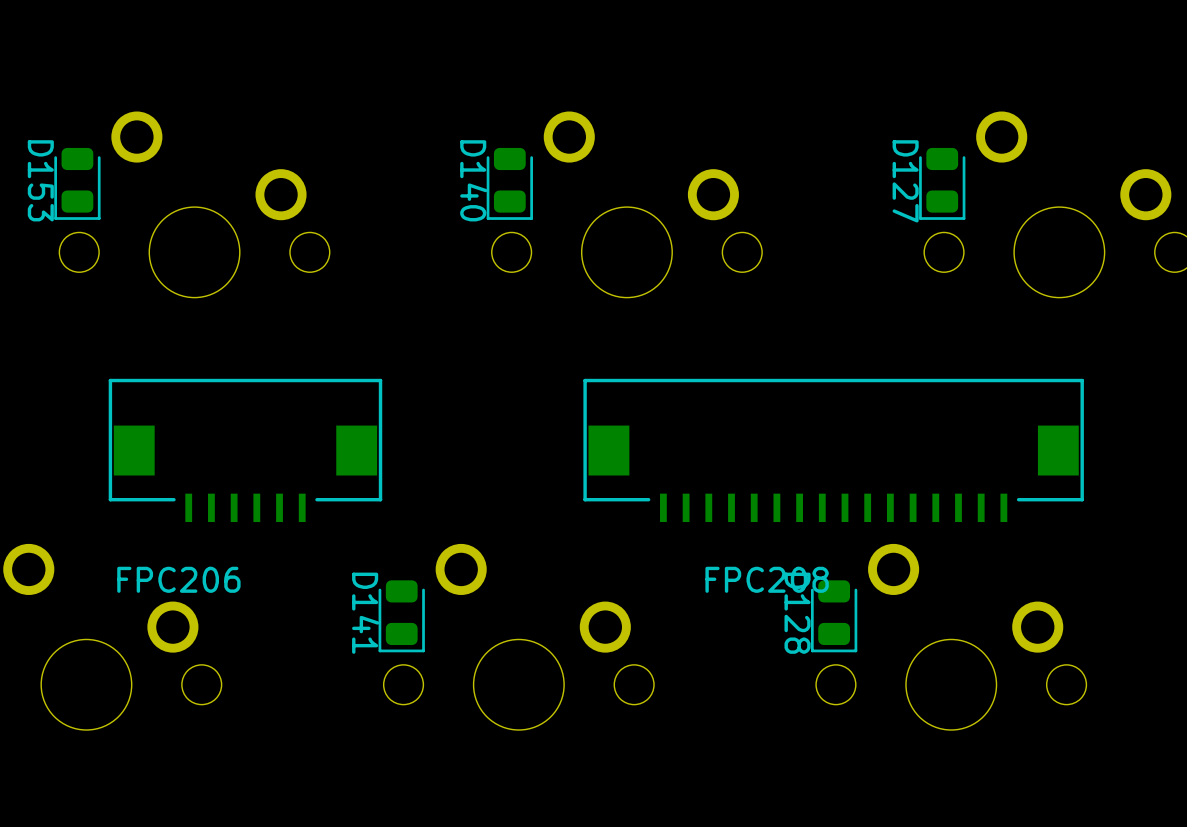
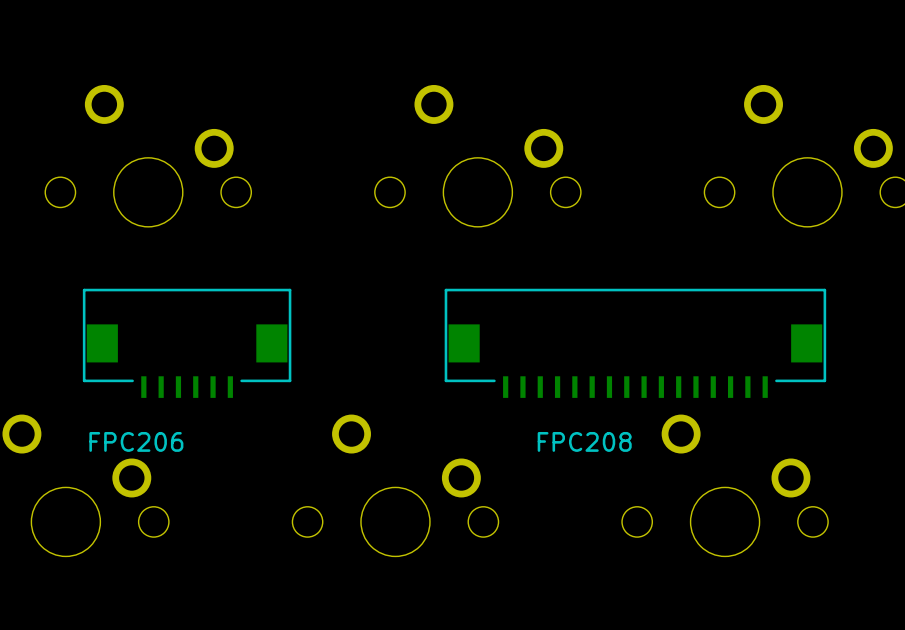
D153: (77, 183) -> none
D140: (509, 183) -> none
D127: (942, 183) -> none
D141: (401, 616) -> none
D128: (834, 616) -> none

